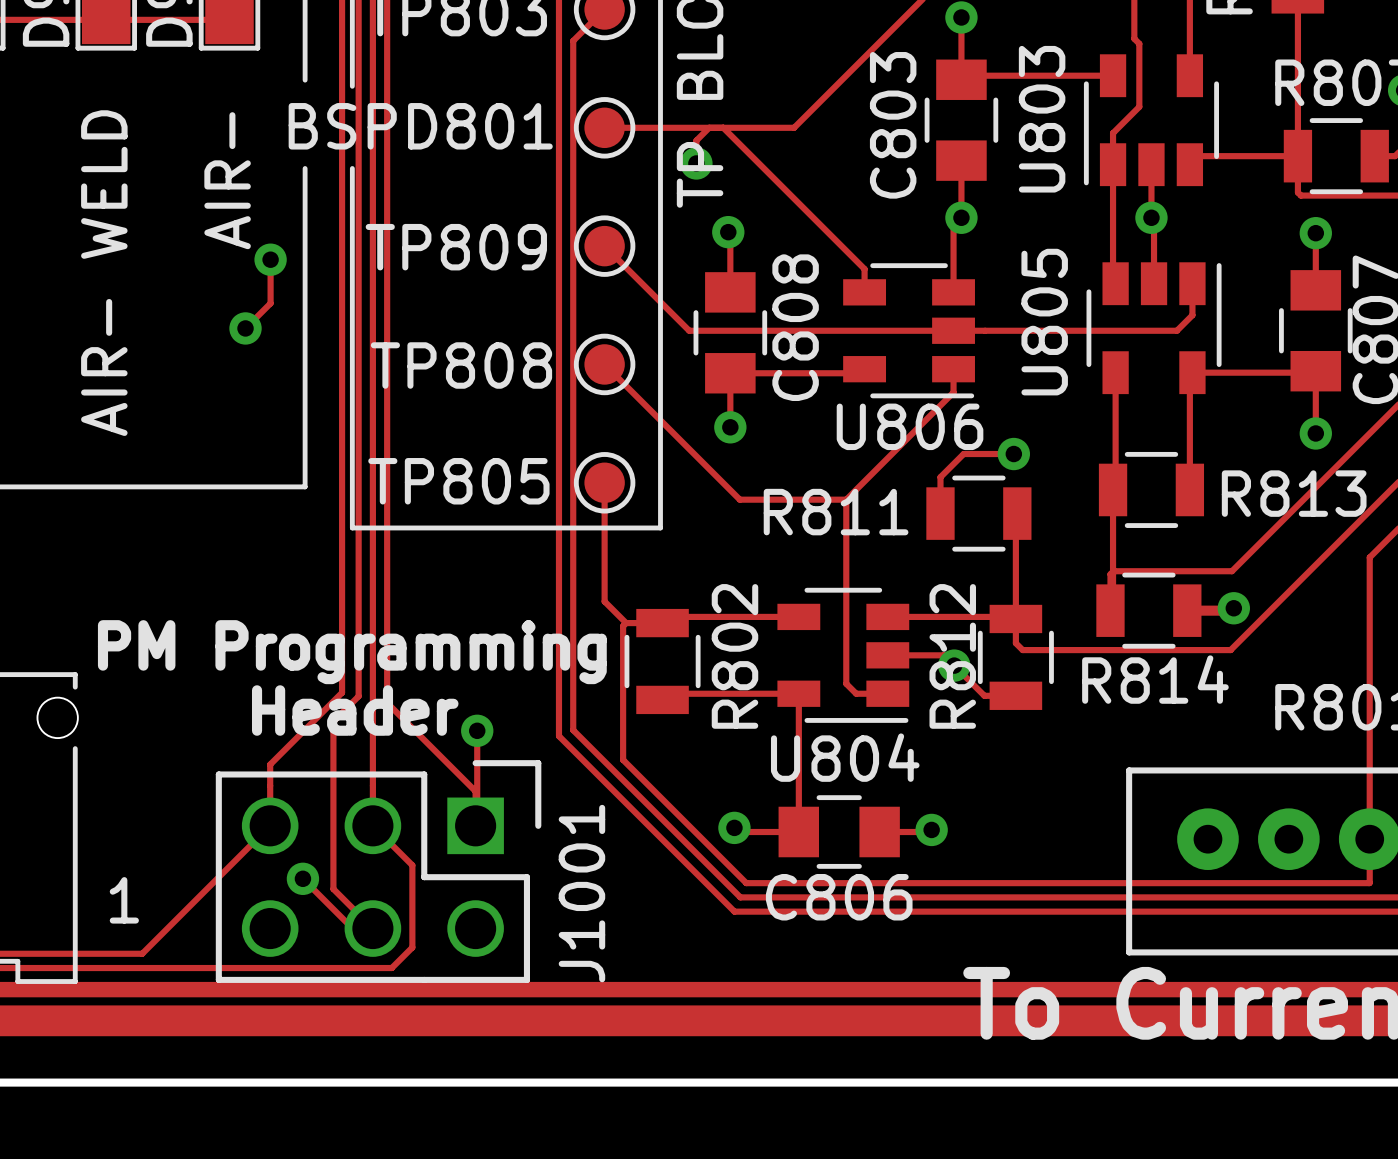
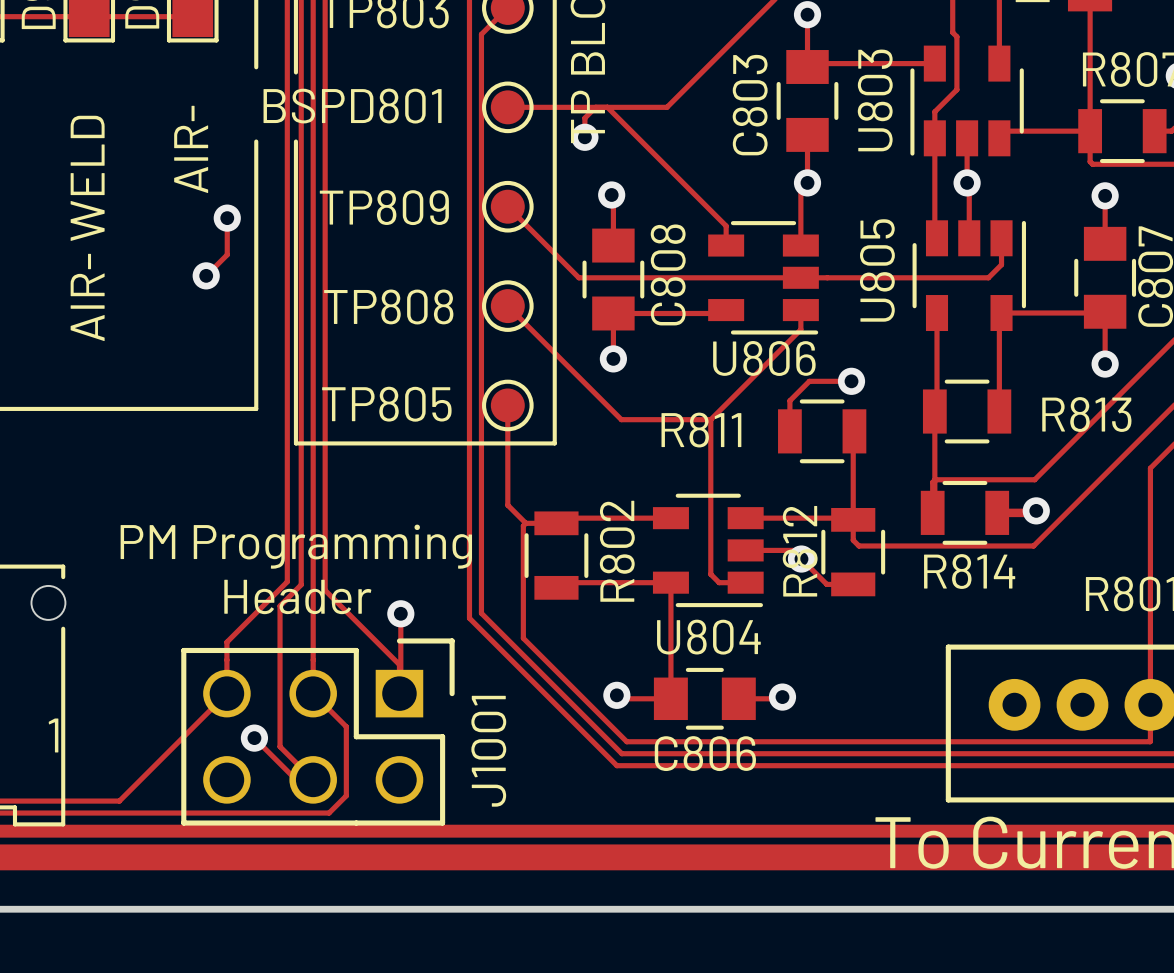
text position: 1 (124, 900) -> 1 (53, 735)

